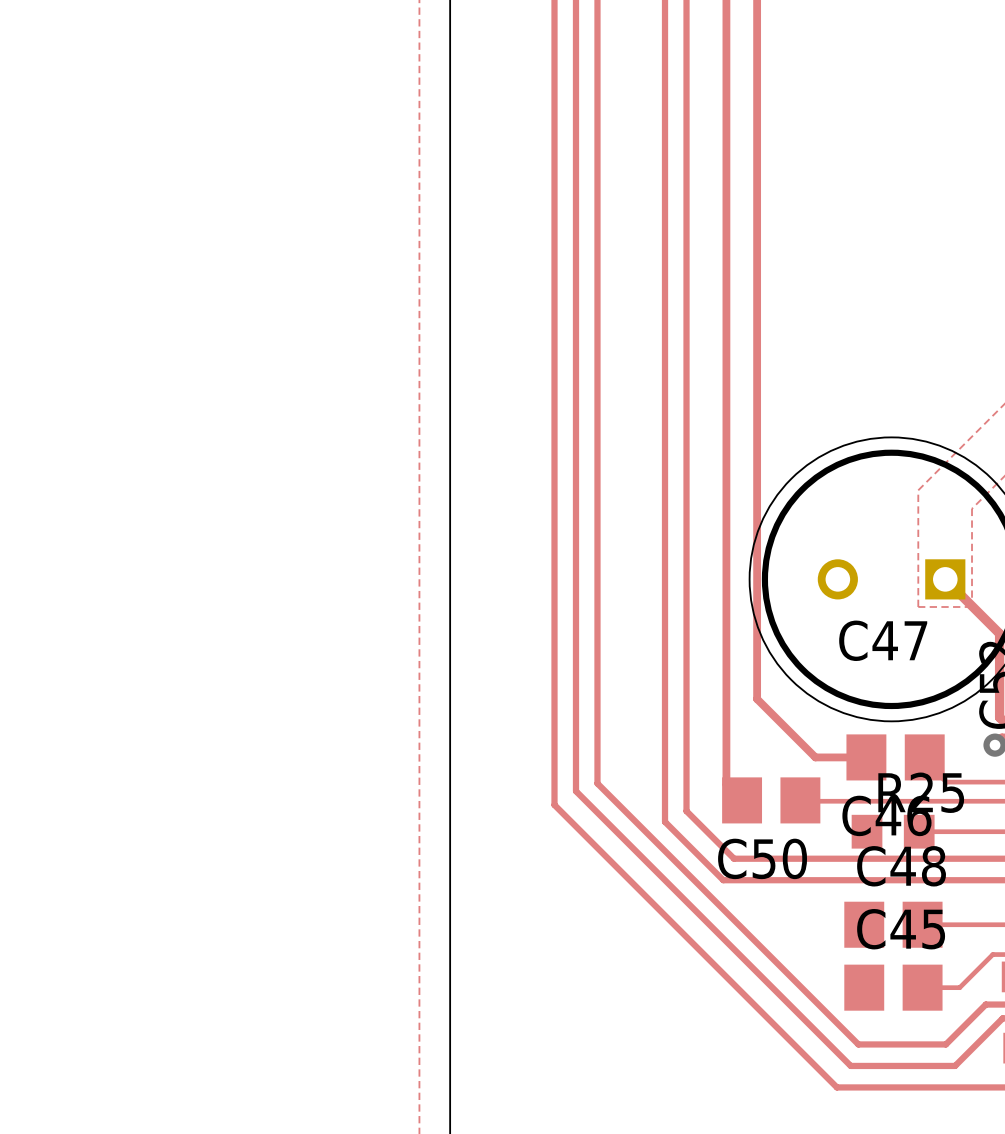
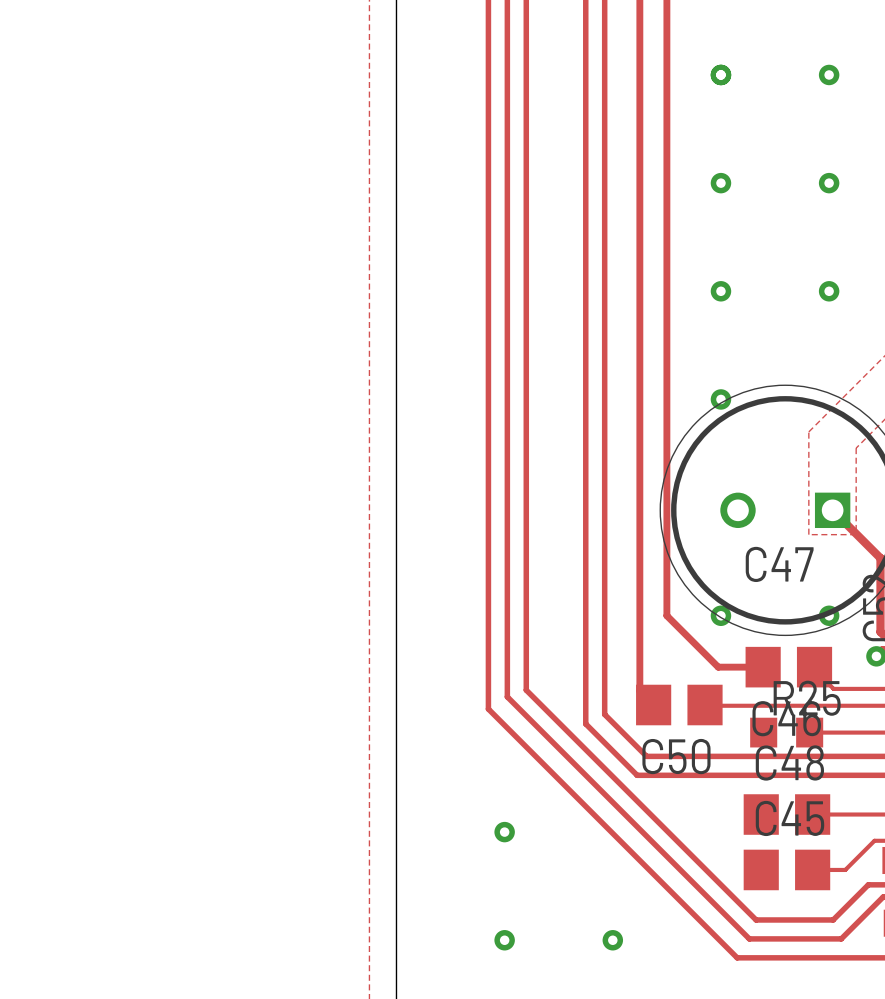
via: none -> (720, 74)
via: none -> (829, 74)
via: none -> (720, 183)
via: none -> (829, 183)
via: none -> (720, 291)
via: none -> (829, 291)
via: none -> (720, 399)
via: none -> (720, 615)
via: none -> (829, 615)
via: none -> (504, 832)
via: none -> (504, 940)
via: none -> (612, 940)

